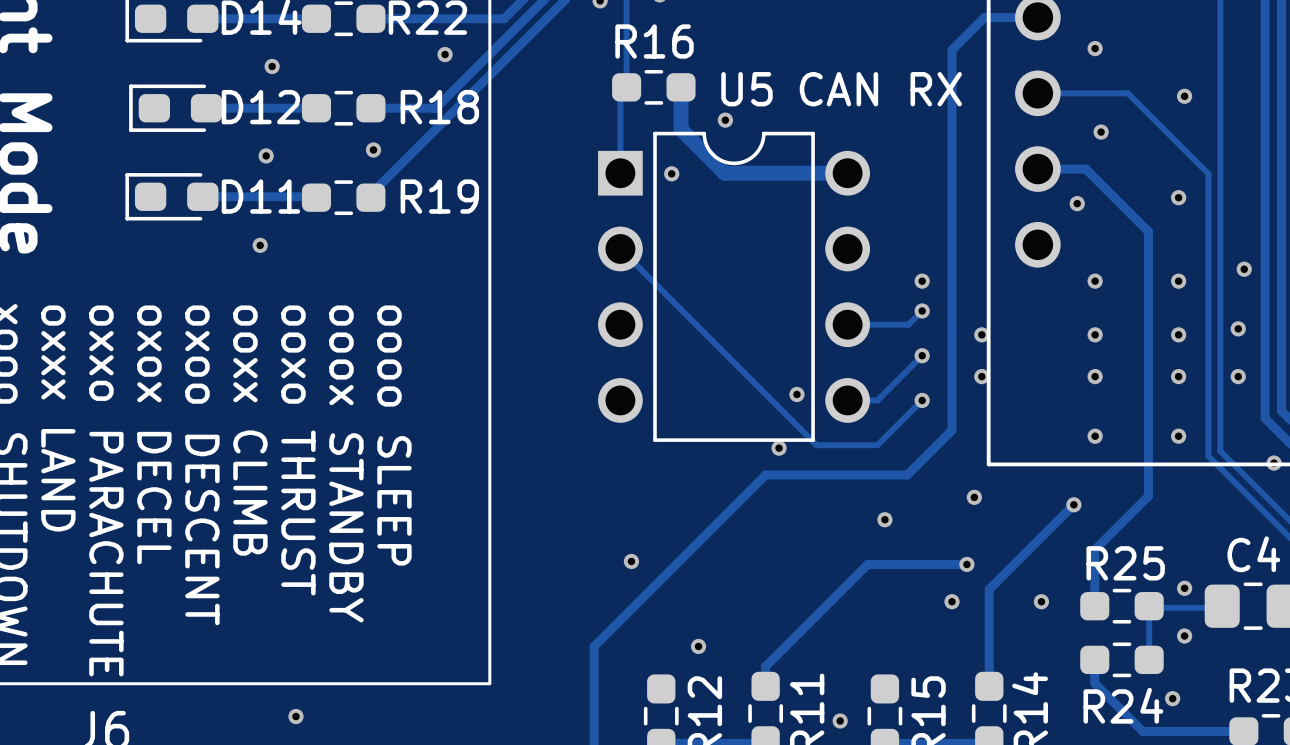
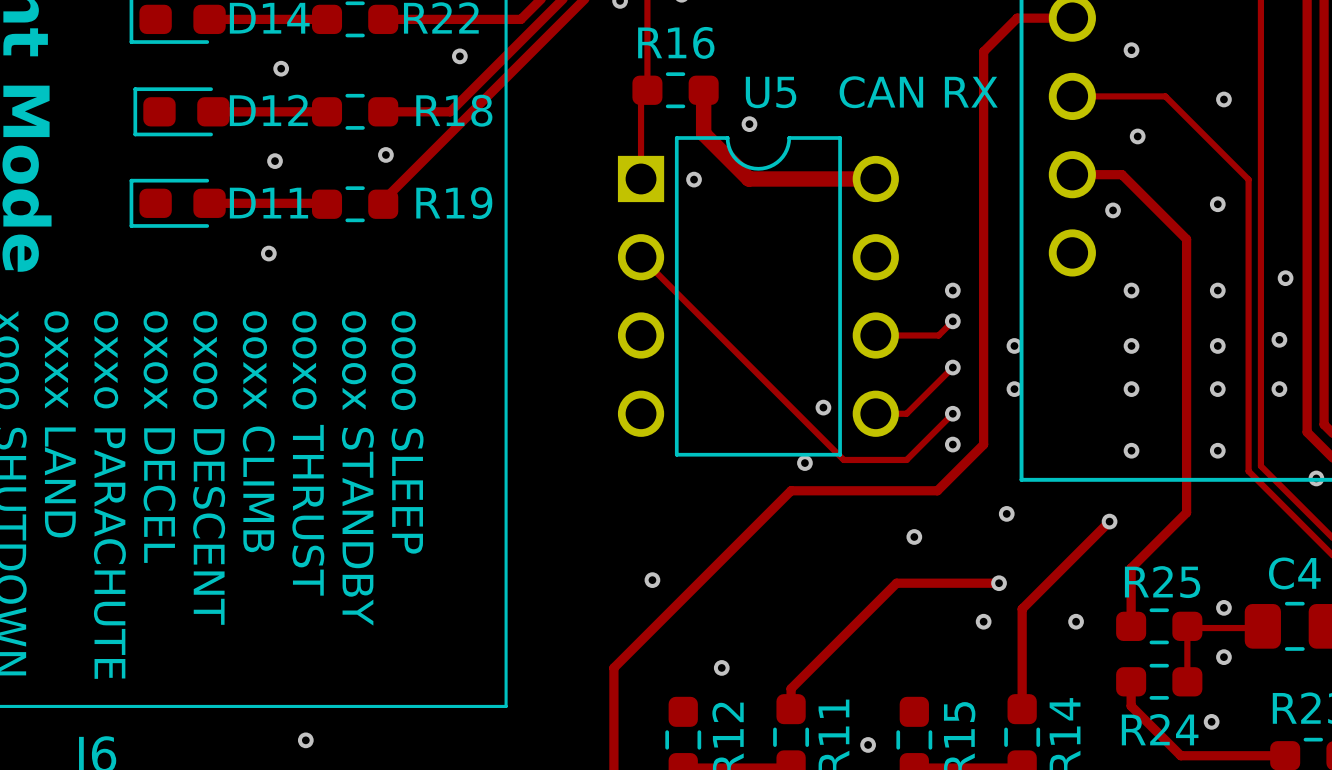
via: none -> (952, 444)

